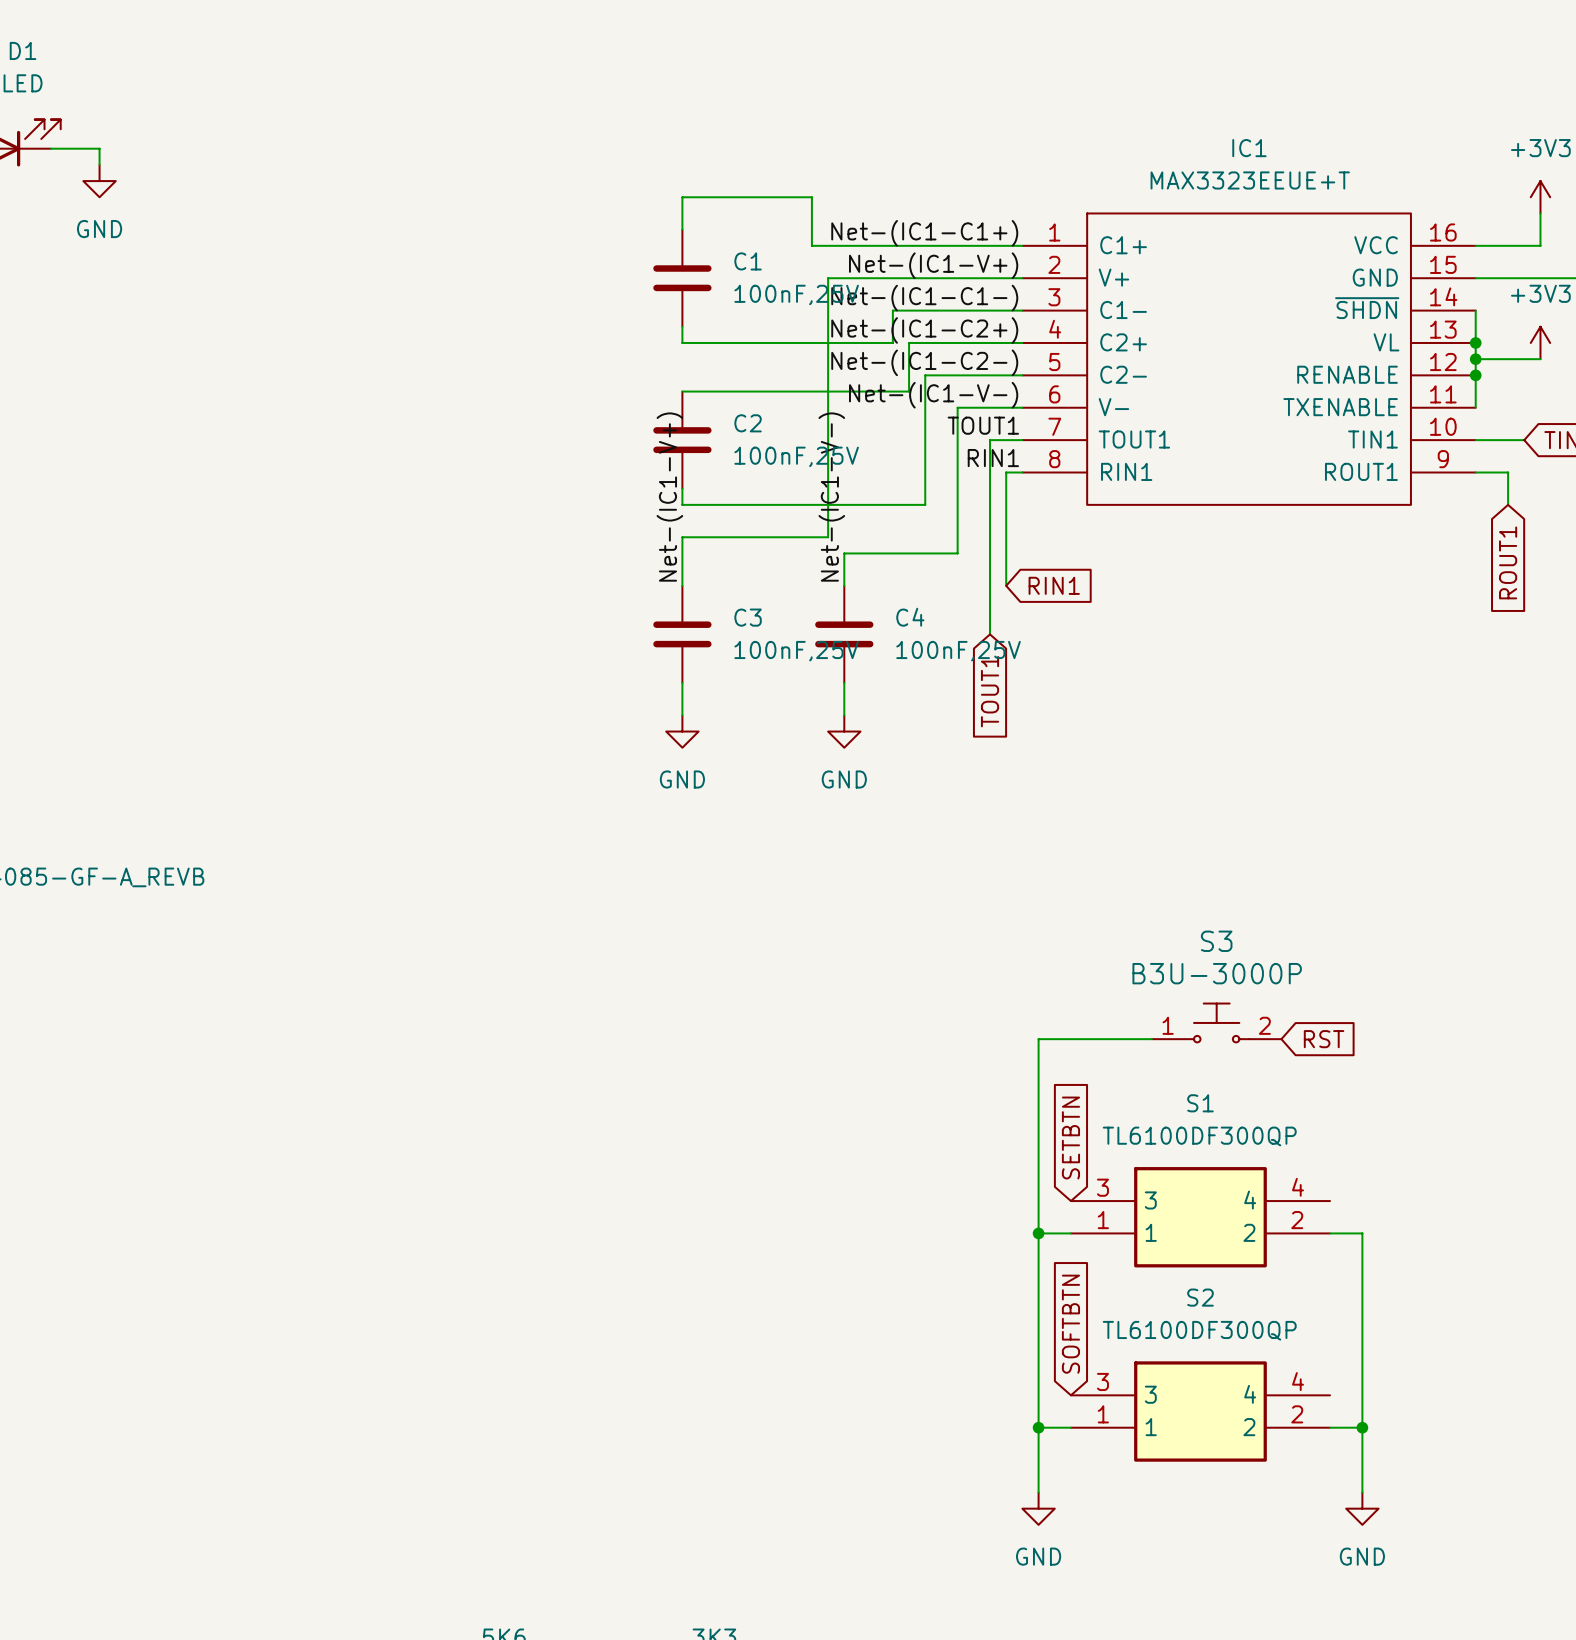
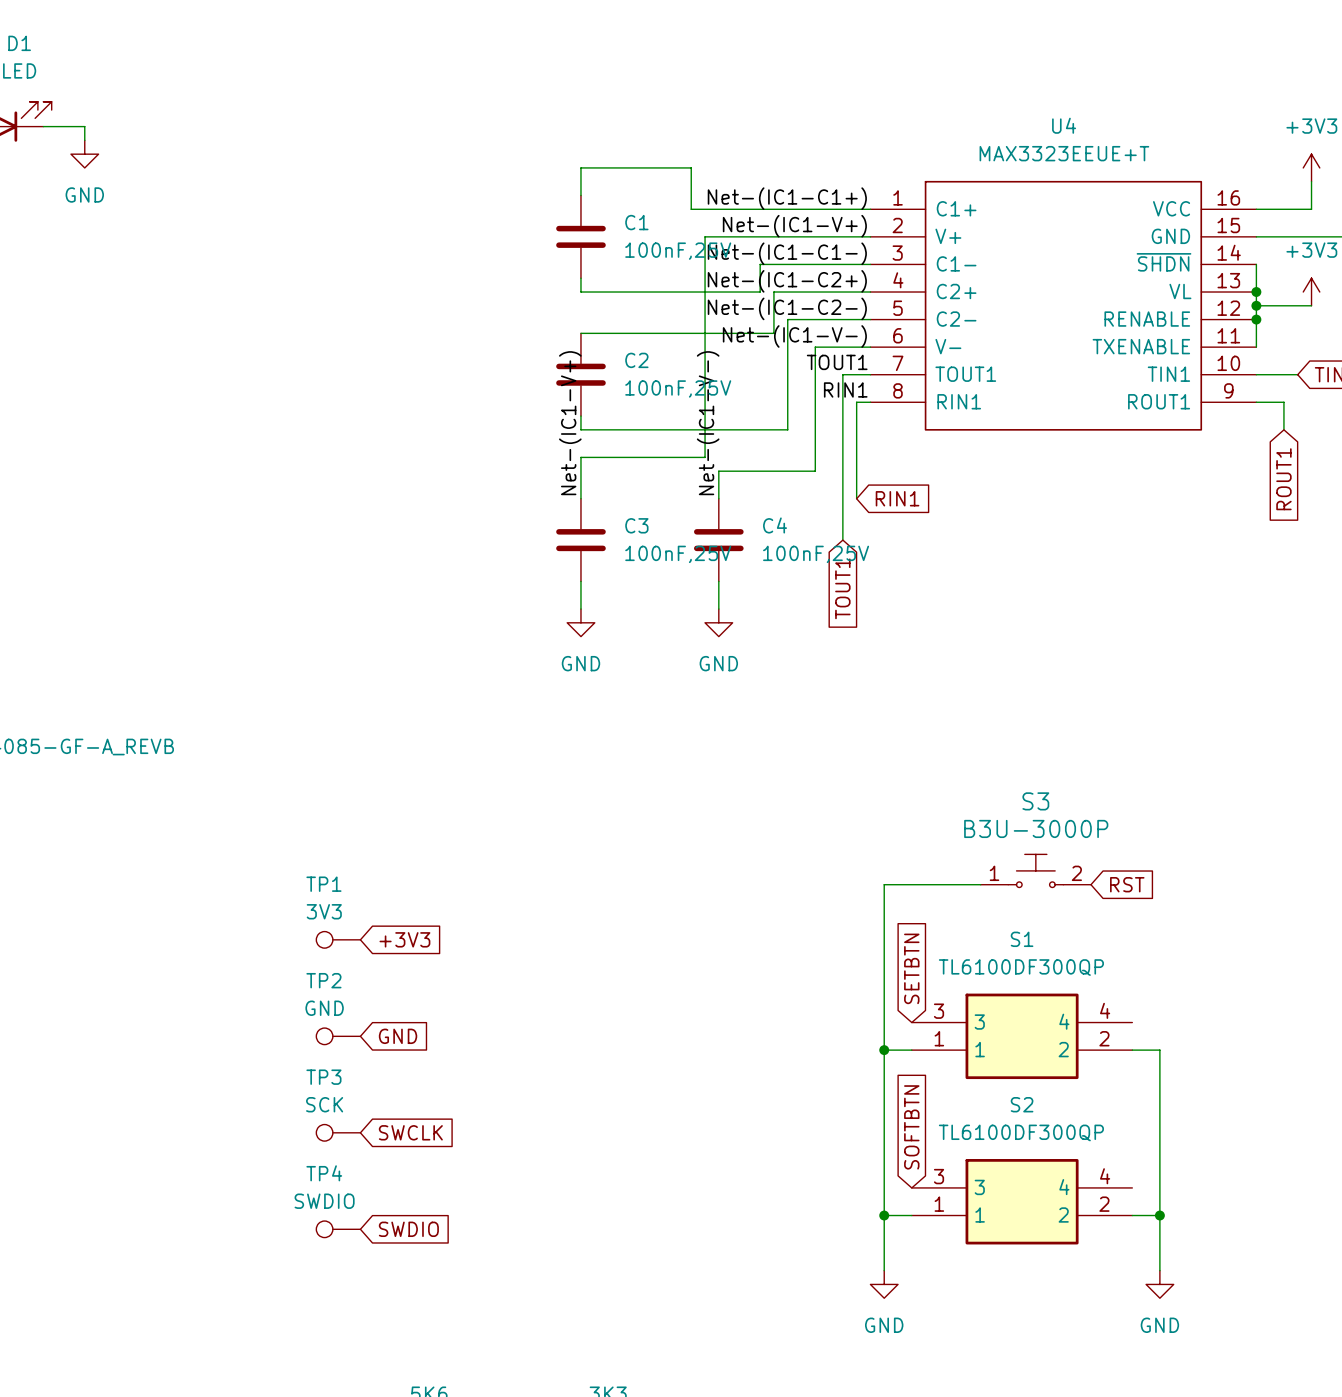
IC1 name: IC1 (1249, 148) -> U4 (1064, 125)
TP1: none -> 3V3 (338, 939)
global label: none -> +3V3 (404, 939)
TP2: none -> GND (338, 1036)
global label: none -> GND (398, 1036)
TP3: none -> SCK (338, 1132)
global label: none -> SWCLK (410, 1132)
TP4: none -> SWDIO (338, 1229)
global label: none -> SWDIO (408, 1229)

